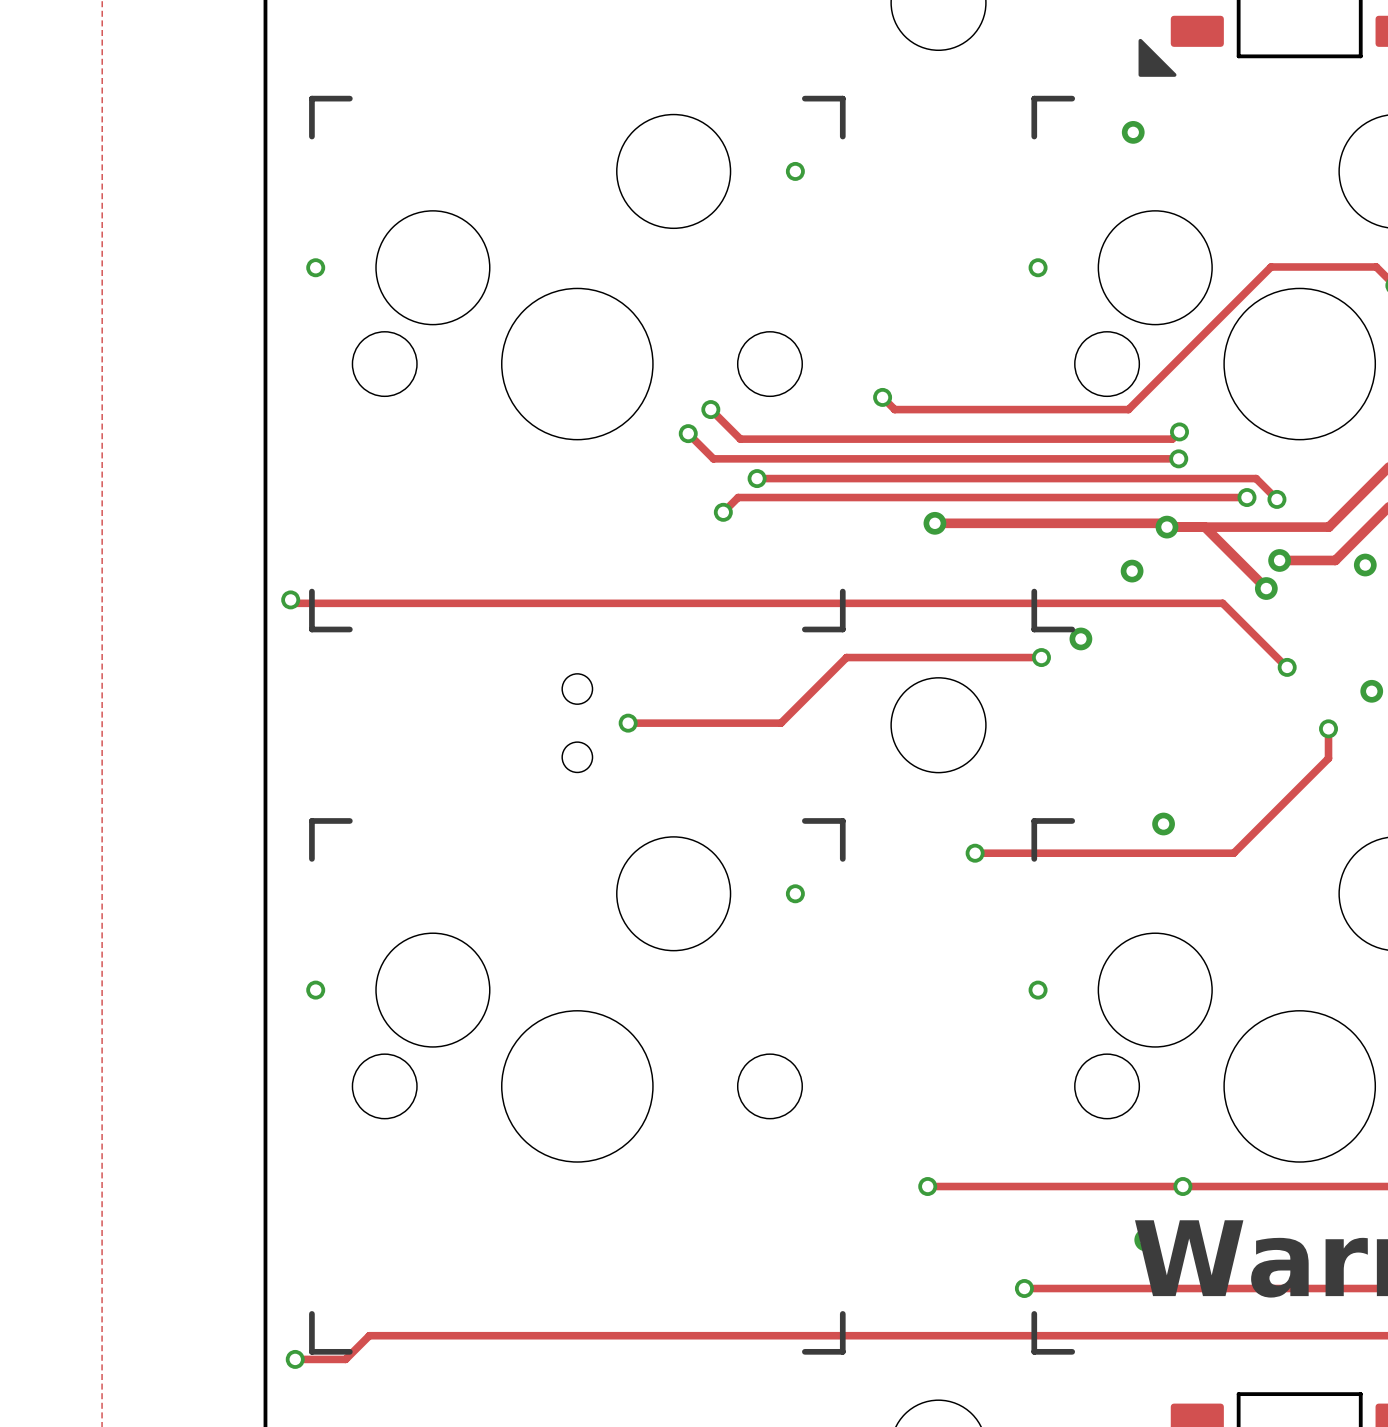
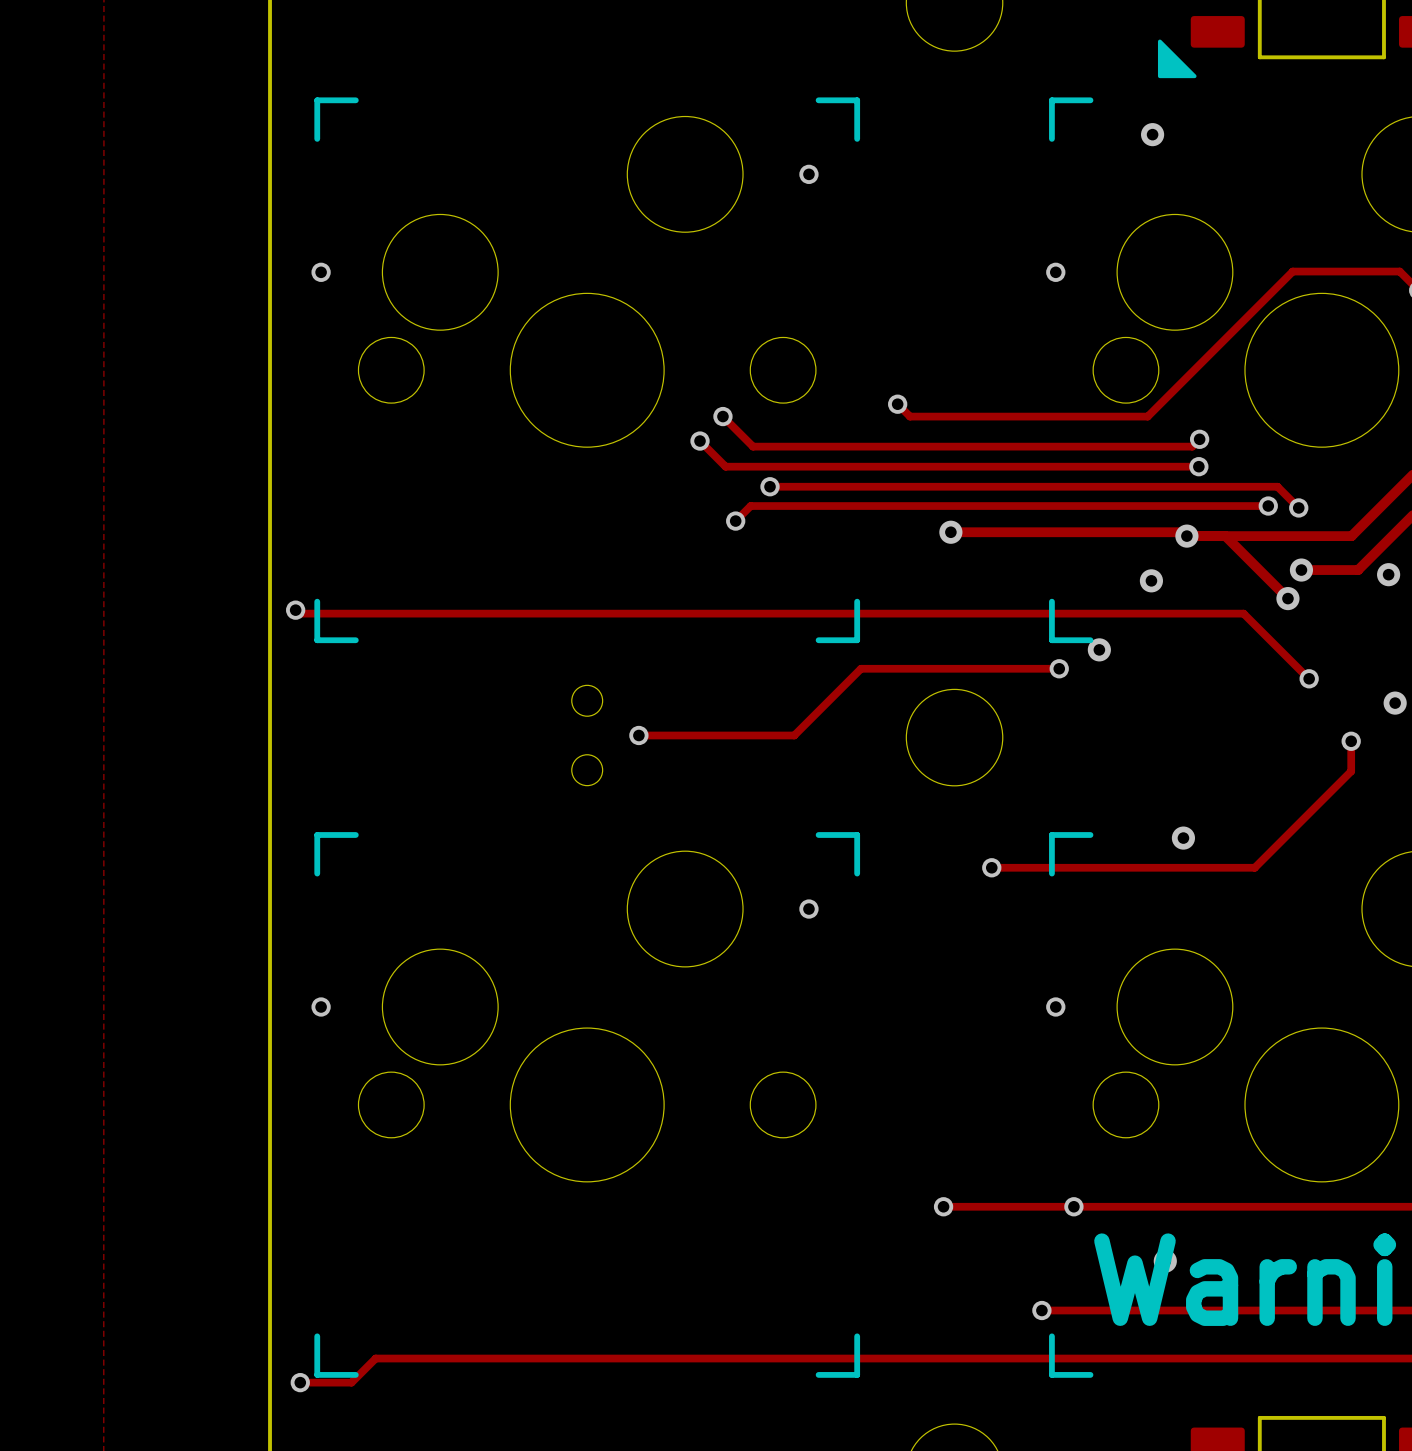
via position: (1182, 1186) -> (1073, 1206)

